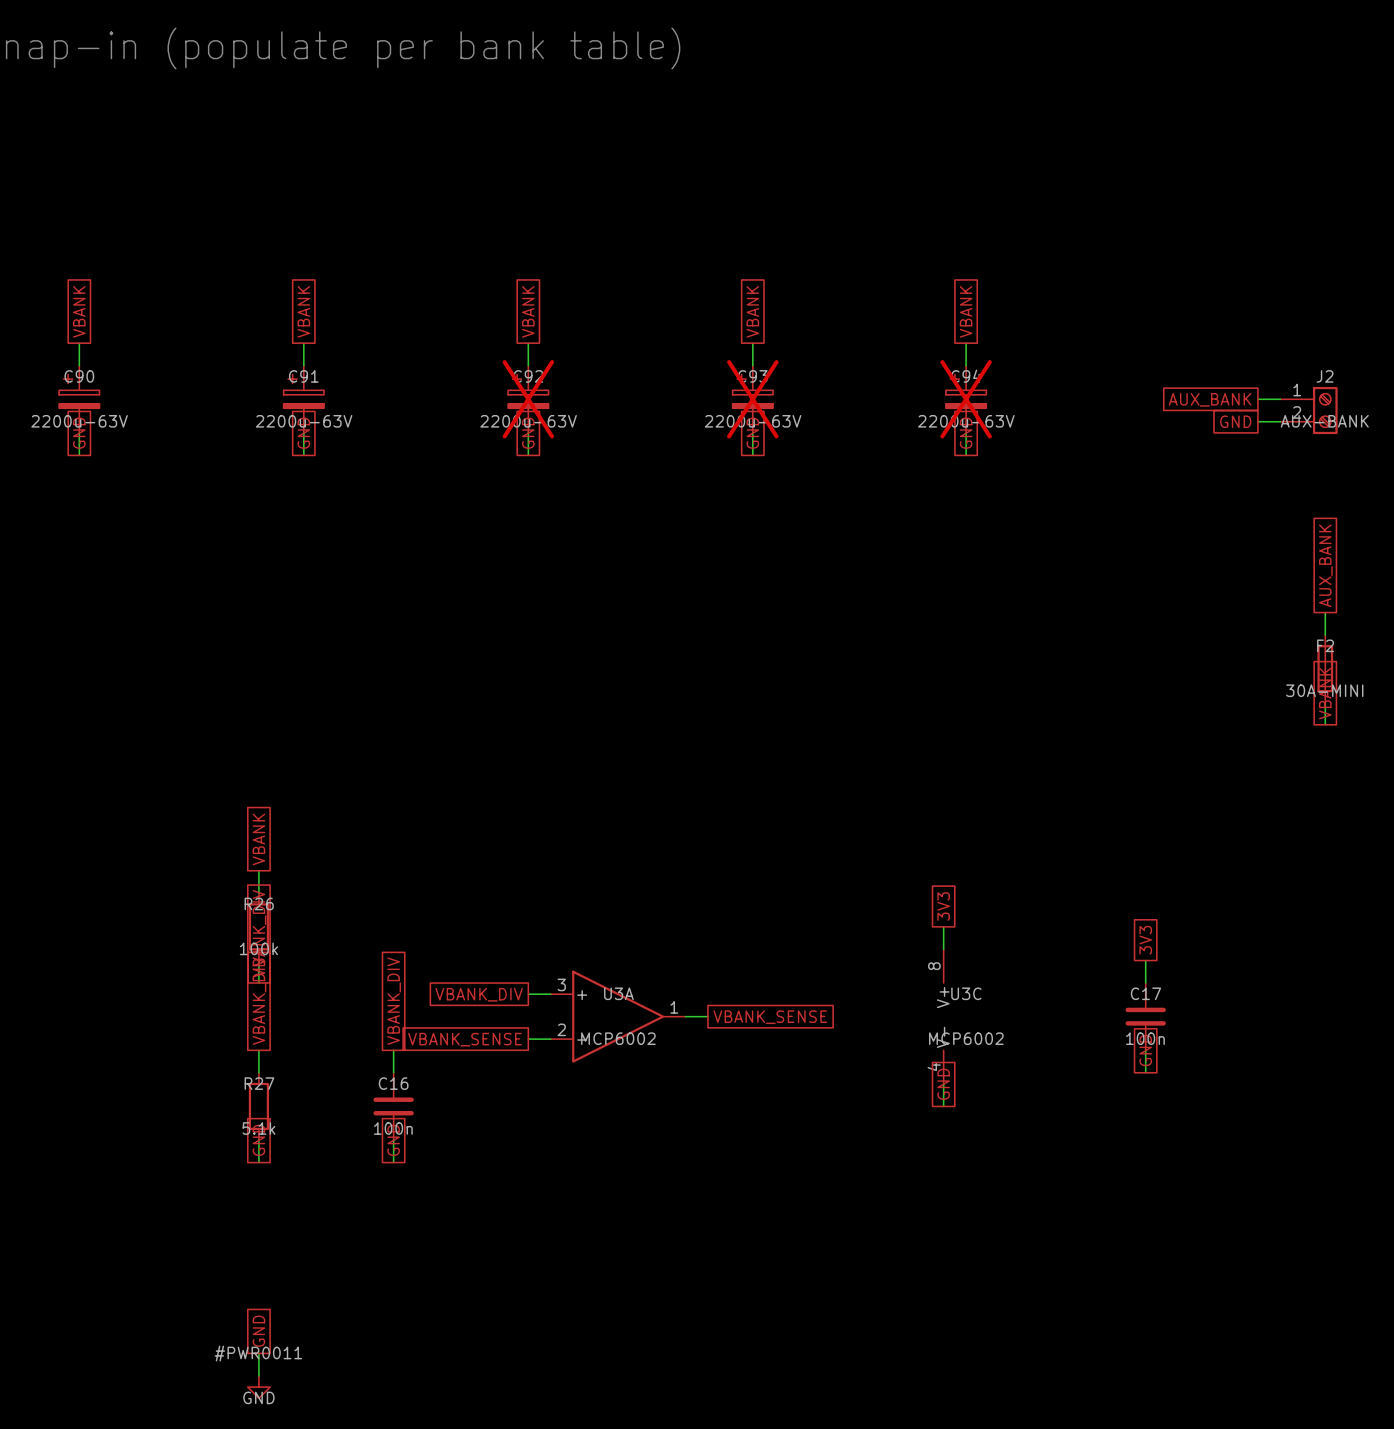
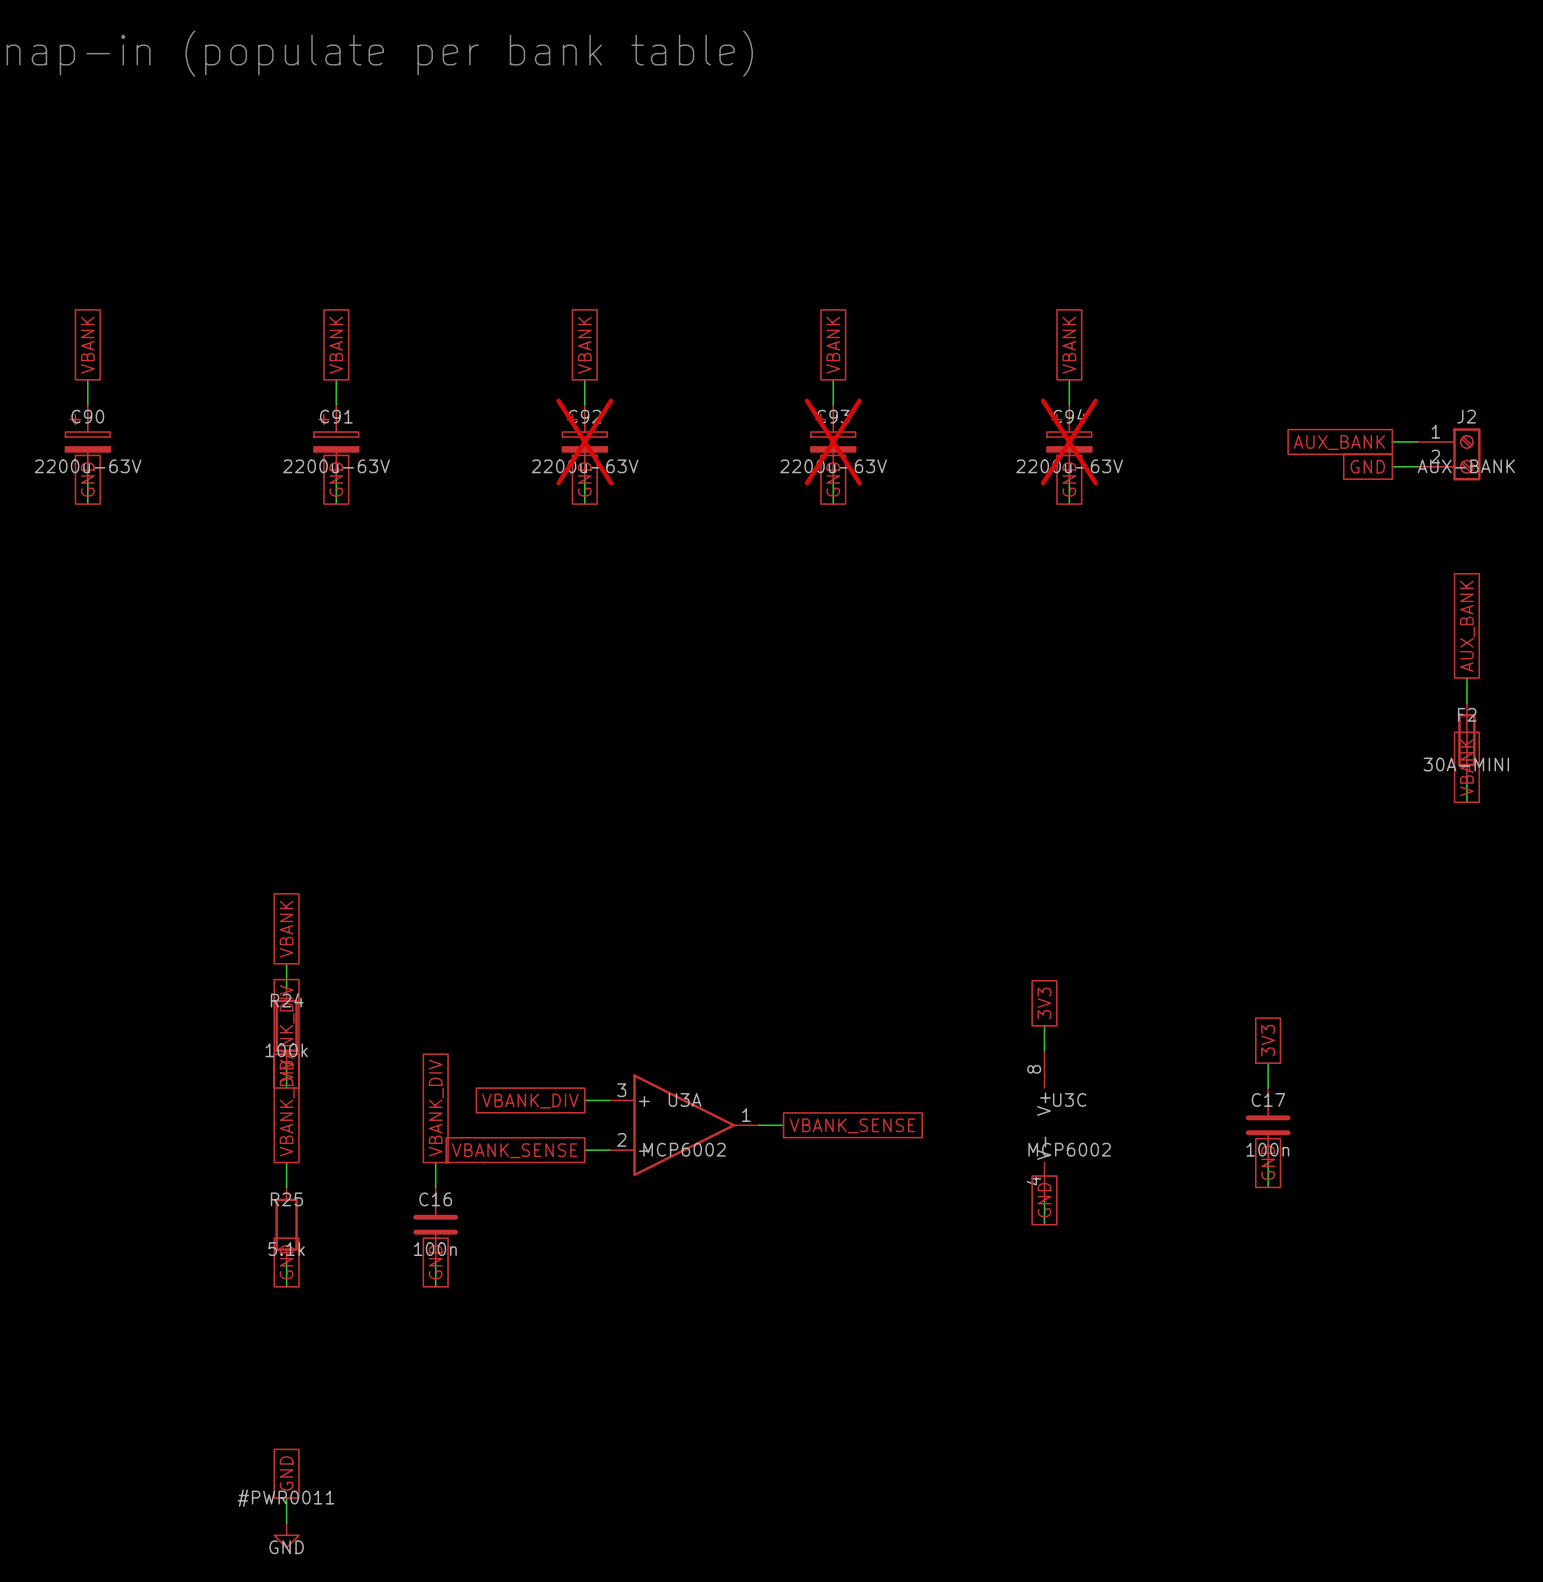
R26 name: R26 (259, 903) -> R24 (287, 1000)
R27 name: R27 (259, 1083) -> R25 (286, 1199)

